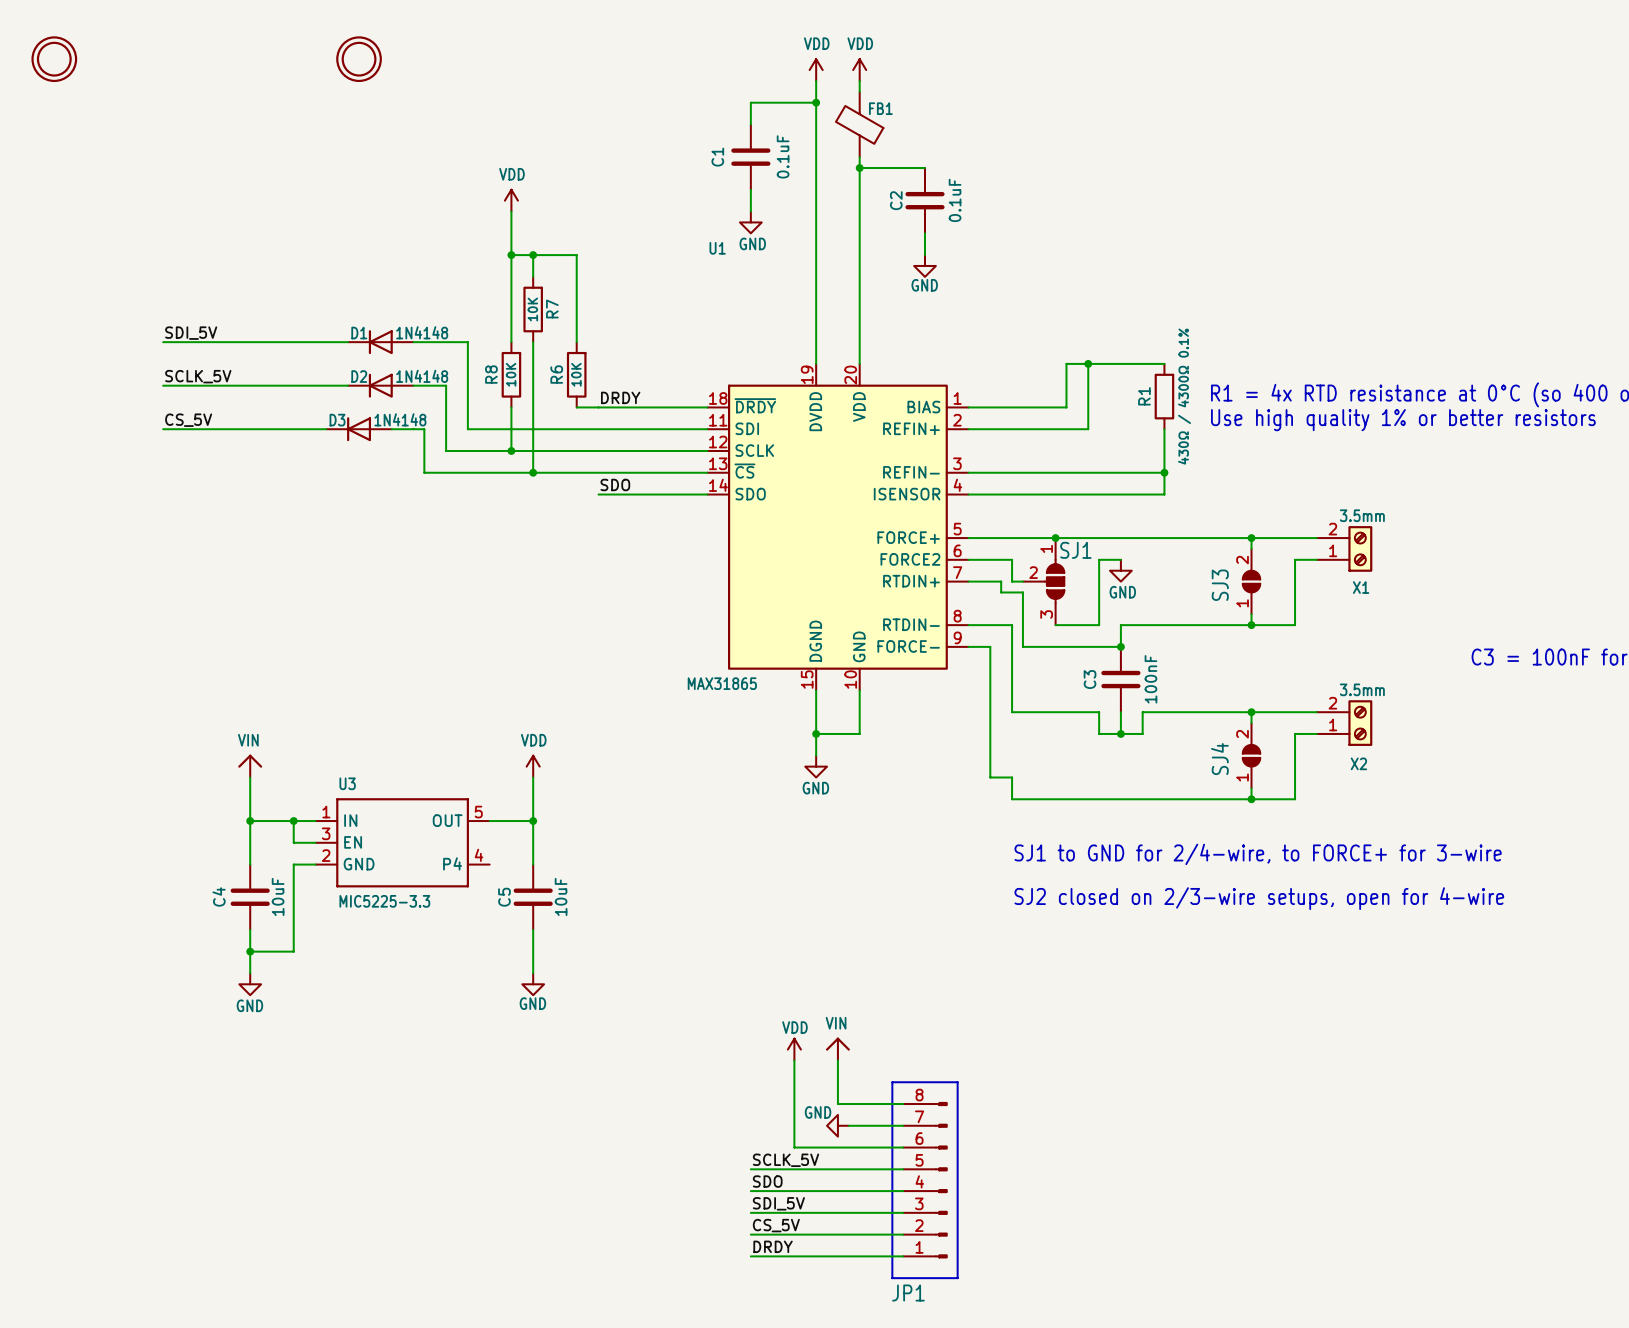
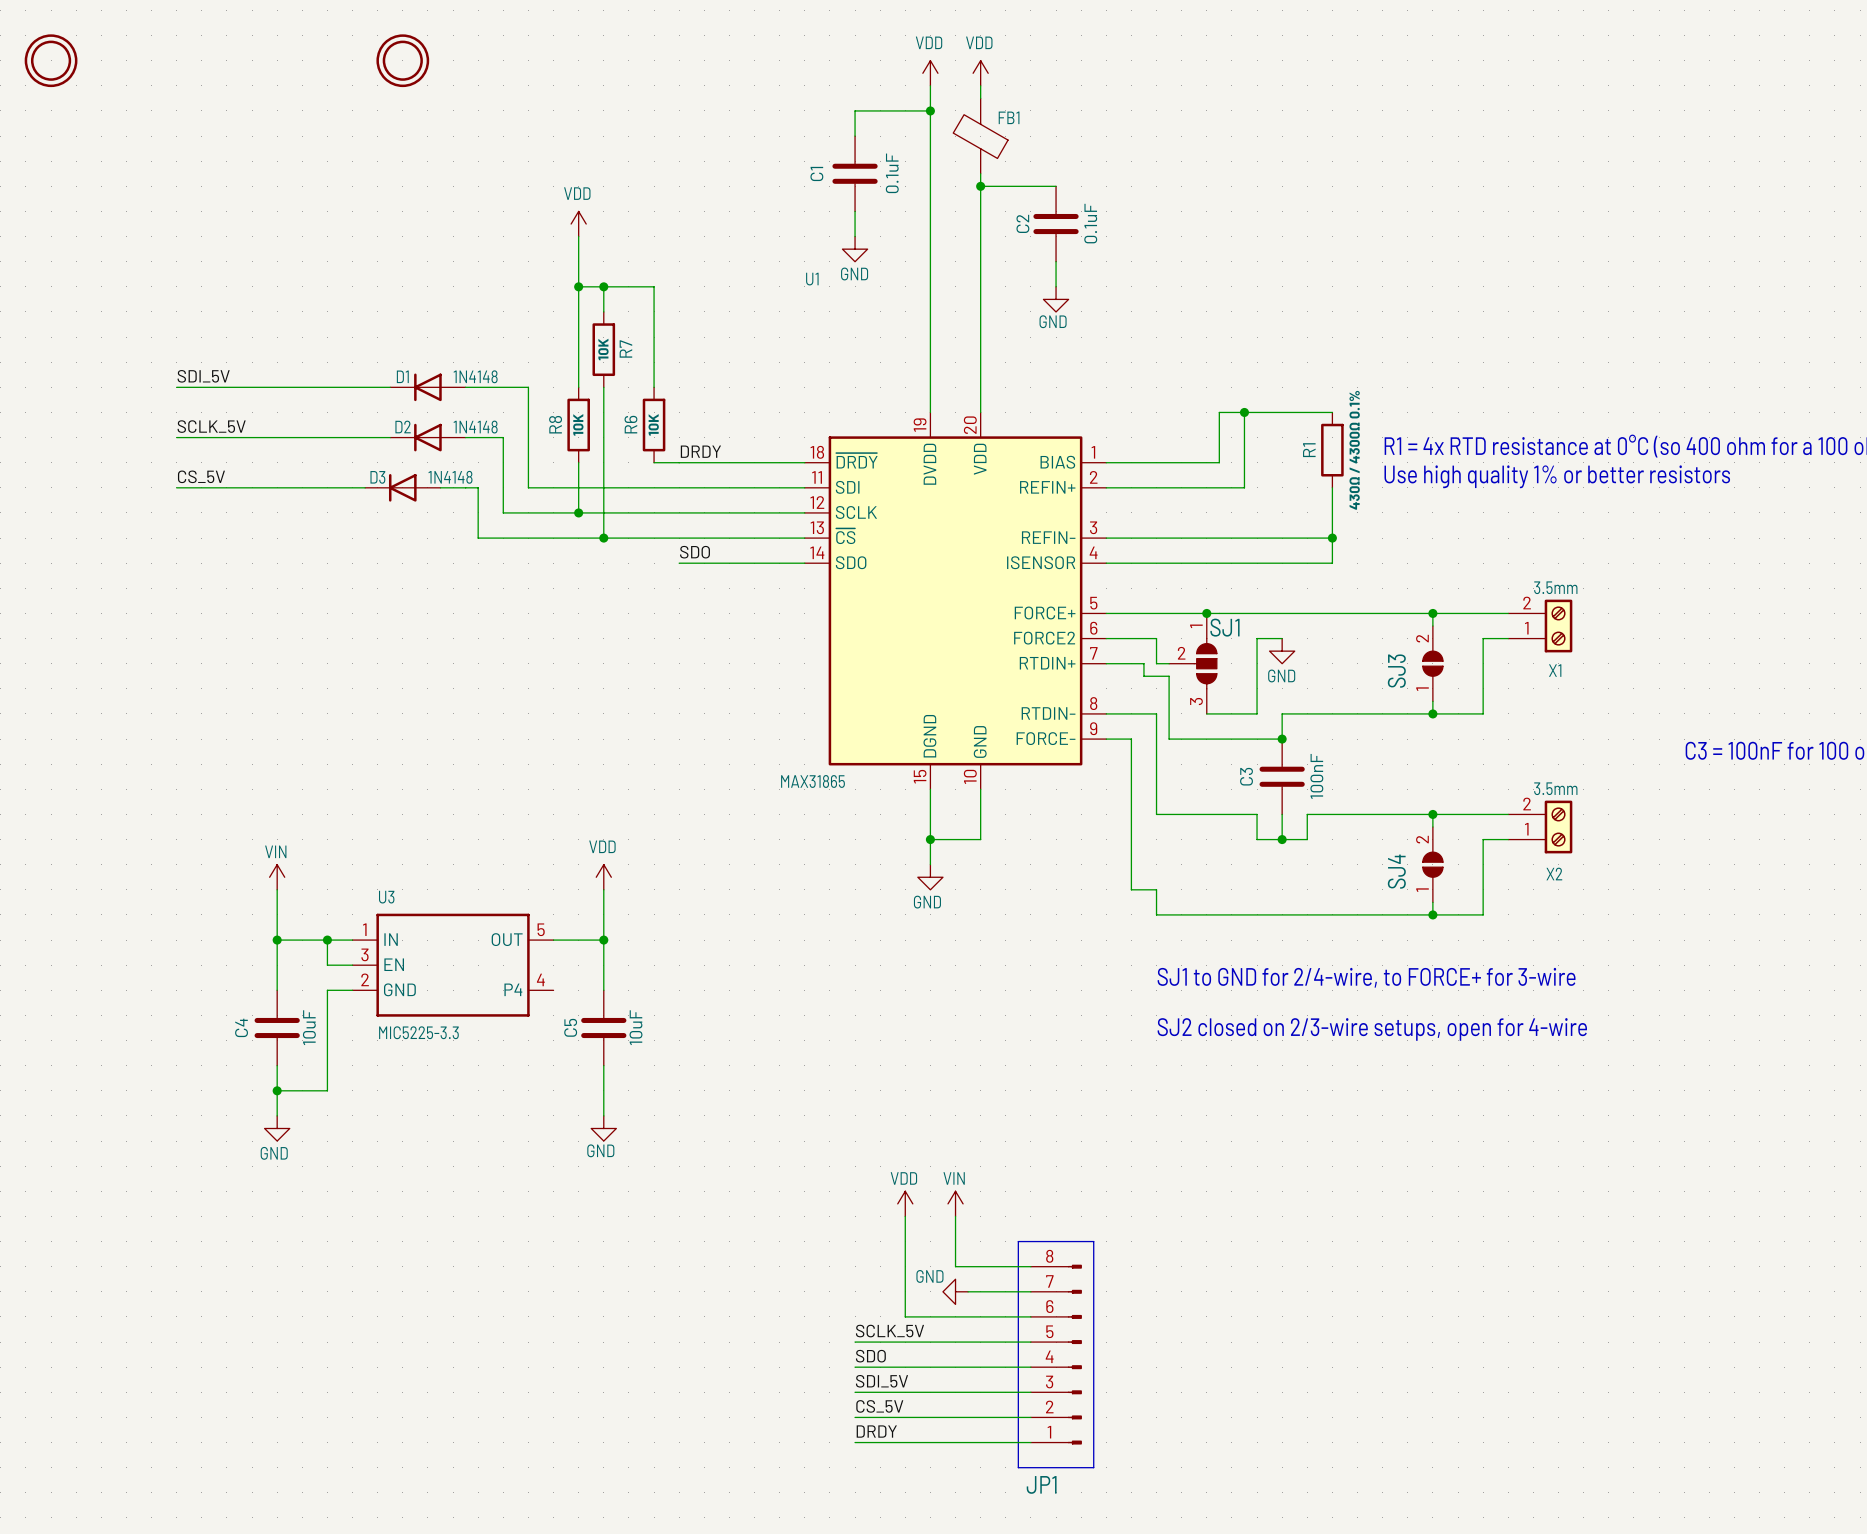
power symbol shape: [238, 754, 263, 778] -> [269, 864, 285, 890]
power symbol shape: [825, 1037, 850, 1061] -> [947, 1191, 964, 1217]

